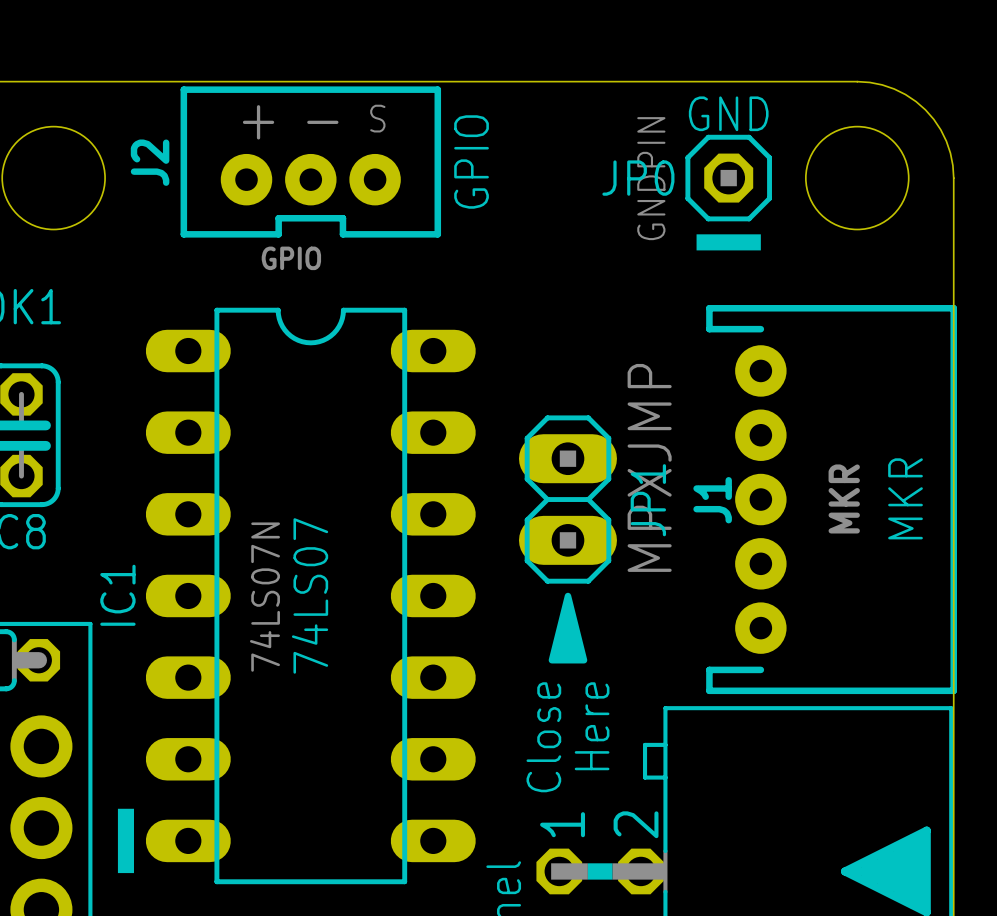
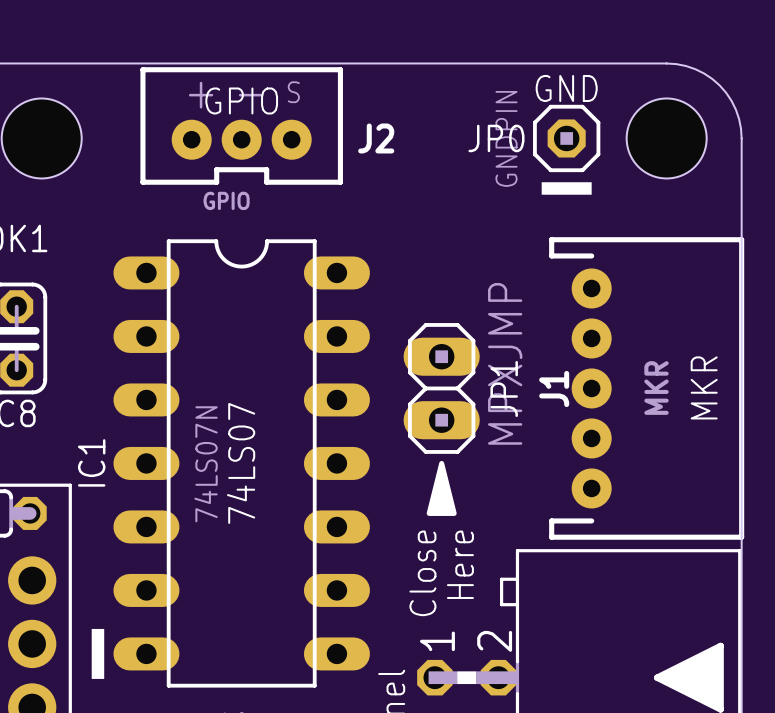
text rotation: 0° (471, 161) -> 90° clockwise (241, 100)
text position: GPIO (471, 161) -> GPIO (241, 100)
J2 name rotation: 0° (150, 162) -> 90° clockwise (376, 138)
J2 name position: J2 (150, 162) -> J2 (376, 138)

